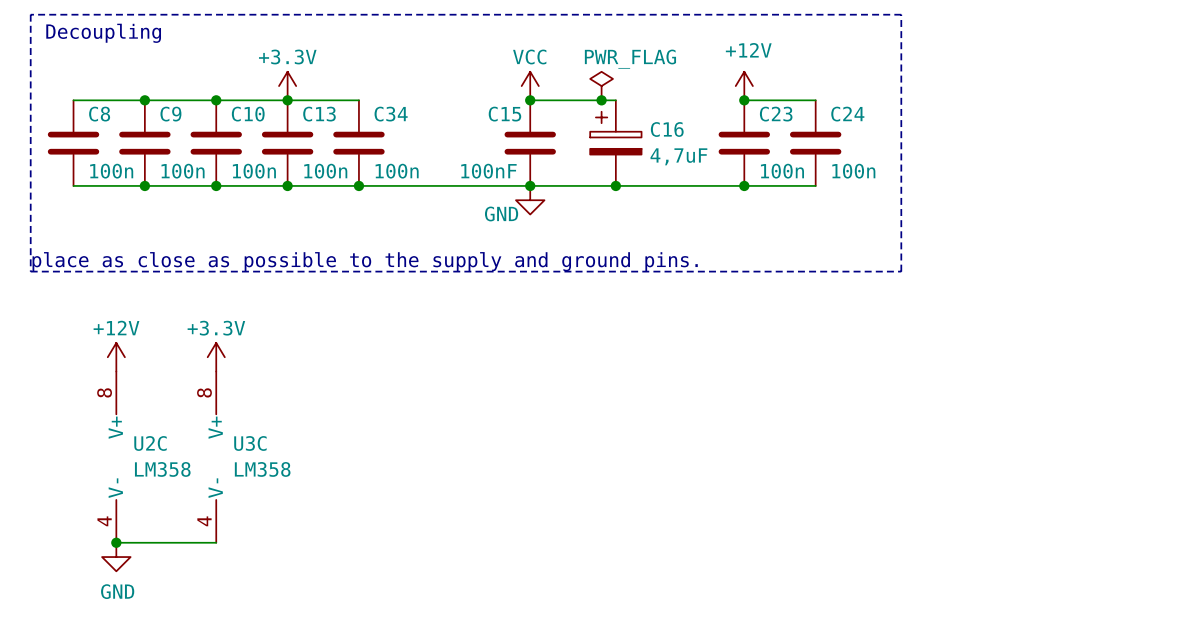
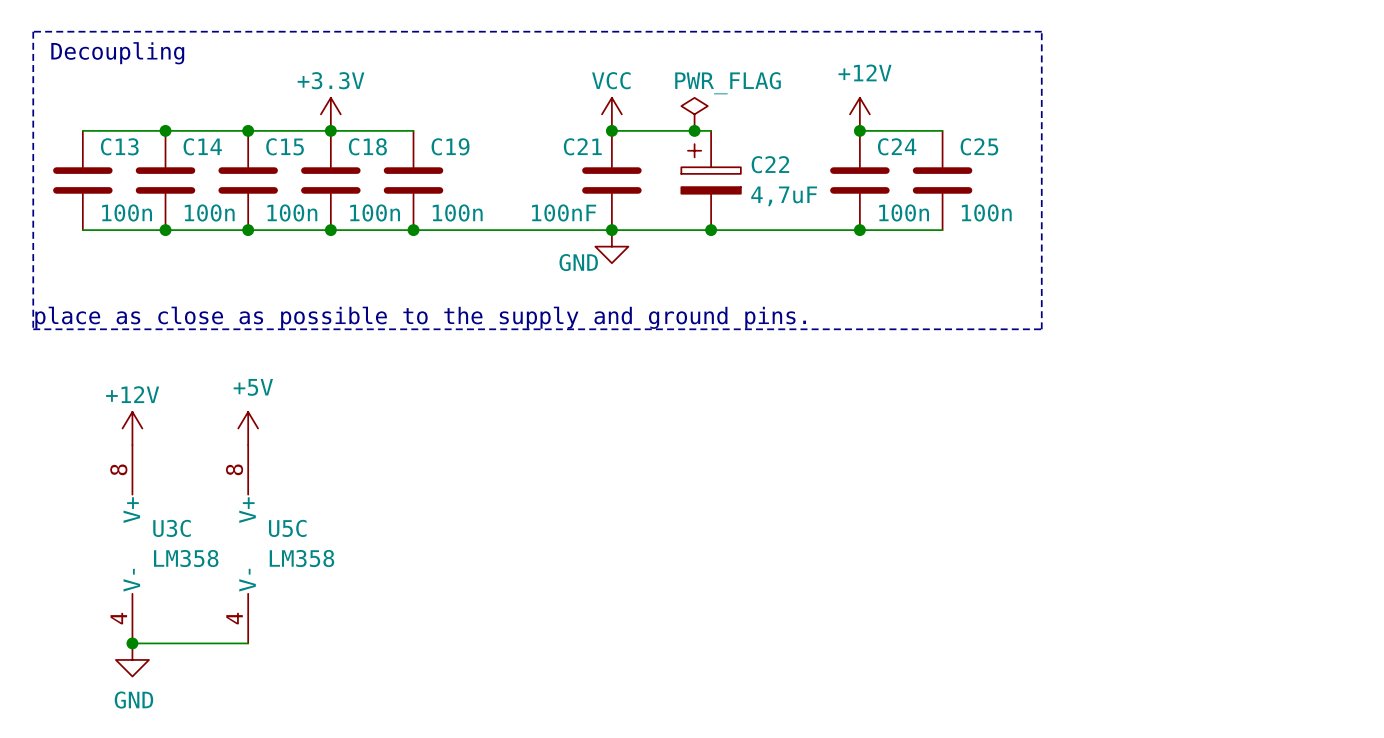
C8 name: C8 (99, 114) -> C13 (119, 146)
C9 name: C9 (170, 114) -> C14 (202, 146)
C10 name: C10 (248, 114) -> C15 (285, 146)
C13 name: C13 (319, 114) -> C18 (367, 146)
C34 name: C34 (391, 114) -> C19 (450, 146)
C15 name: C15 (504, 114) -> C21 (582, 146)
C23 name: C23 (776, 114) -> C24 (897, 146)
C24 name: C24 (847, 114) -> C25 (979, 146)
C16 name: C16 (667, 129) -> C22 (770, 164)
power symbol: +3.3V (216, 357) -> +5V (248, 428)
U2C name: U2C (150, 443) -> U3C (172, 528)
U3C name: U3C (250, 443) -> U5C (287, 528)

